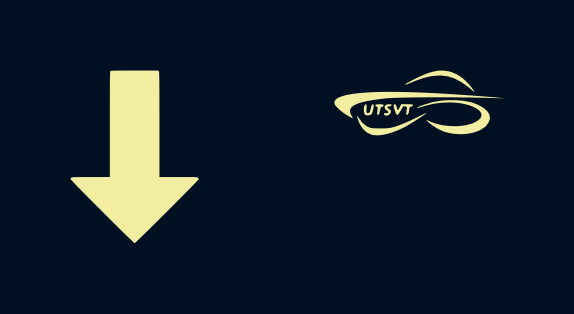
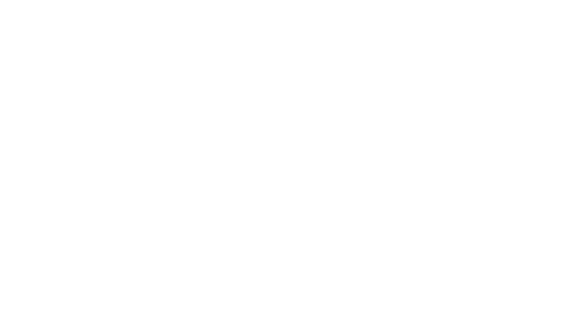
drawing: [70, 70, 199, 244] -> none
drawing: [334, 70, 504, 136] -> none

